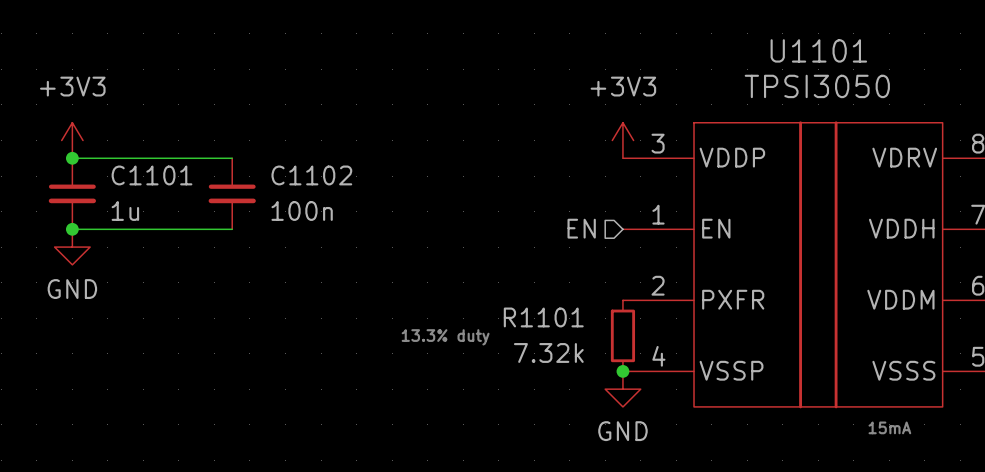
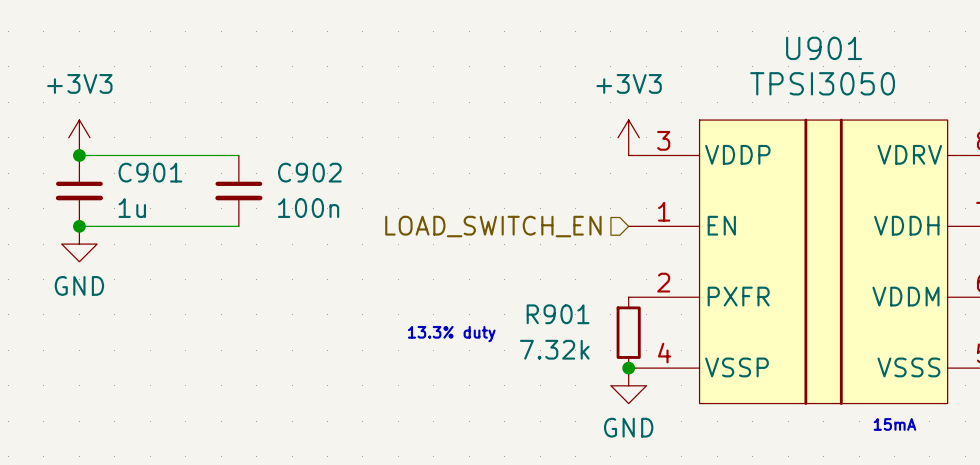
U1101 name: U1101 (818, 50) -> U901 (824, 48)
C1101 name: C1101 (152, 175) -> C901 (150, 172)
C1102 name: C1102 (311, 175) -> C902 (309, 172)
hierarchical label: EN (581, 228) -> LOAD_SWITCH_EN (493, 226)
R1101 name: R1101 (543, 317) -> R901 (558, 314)

